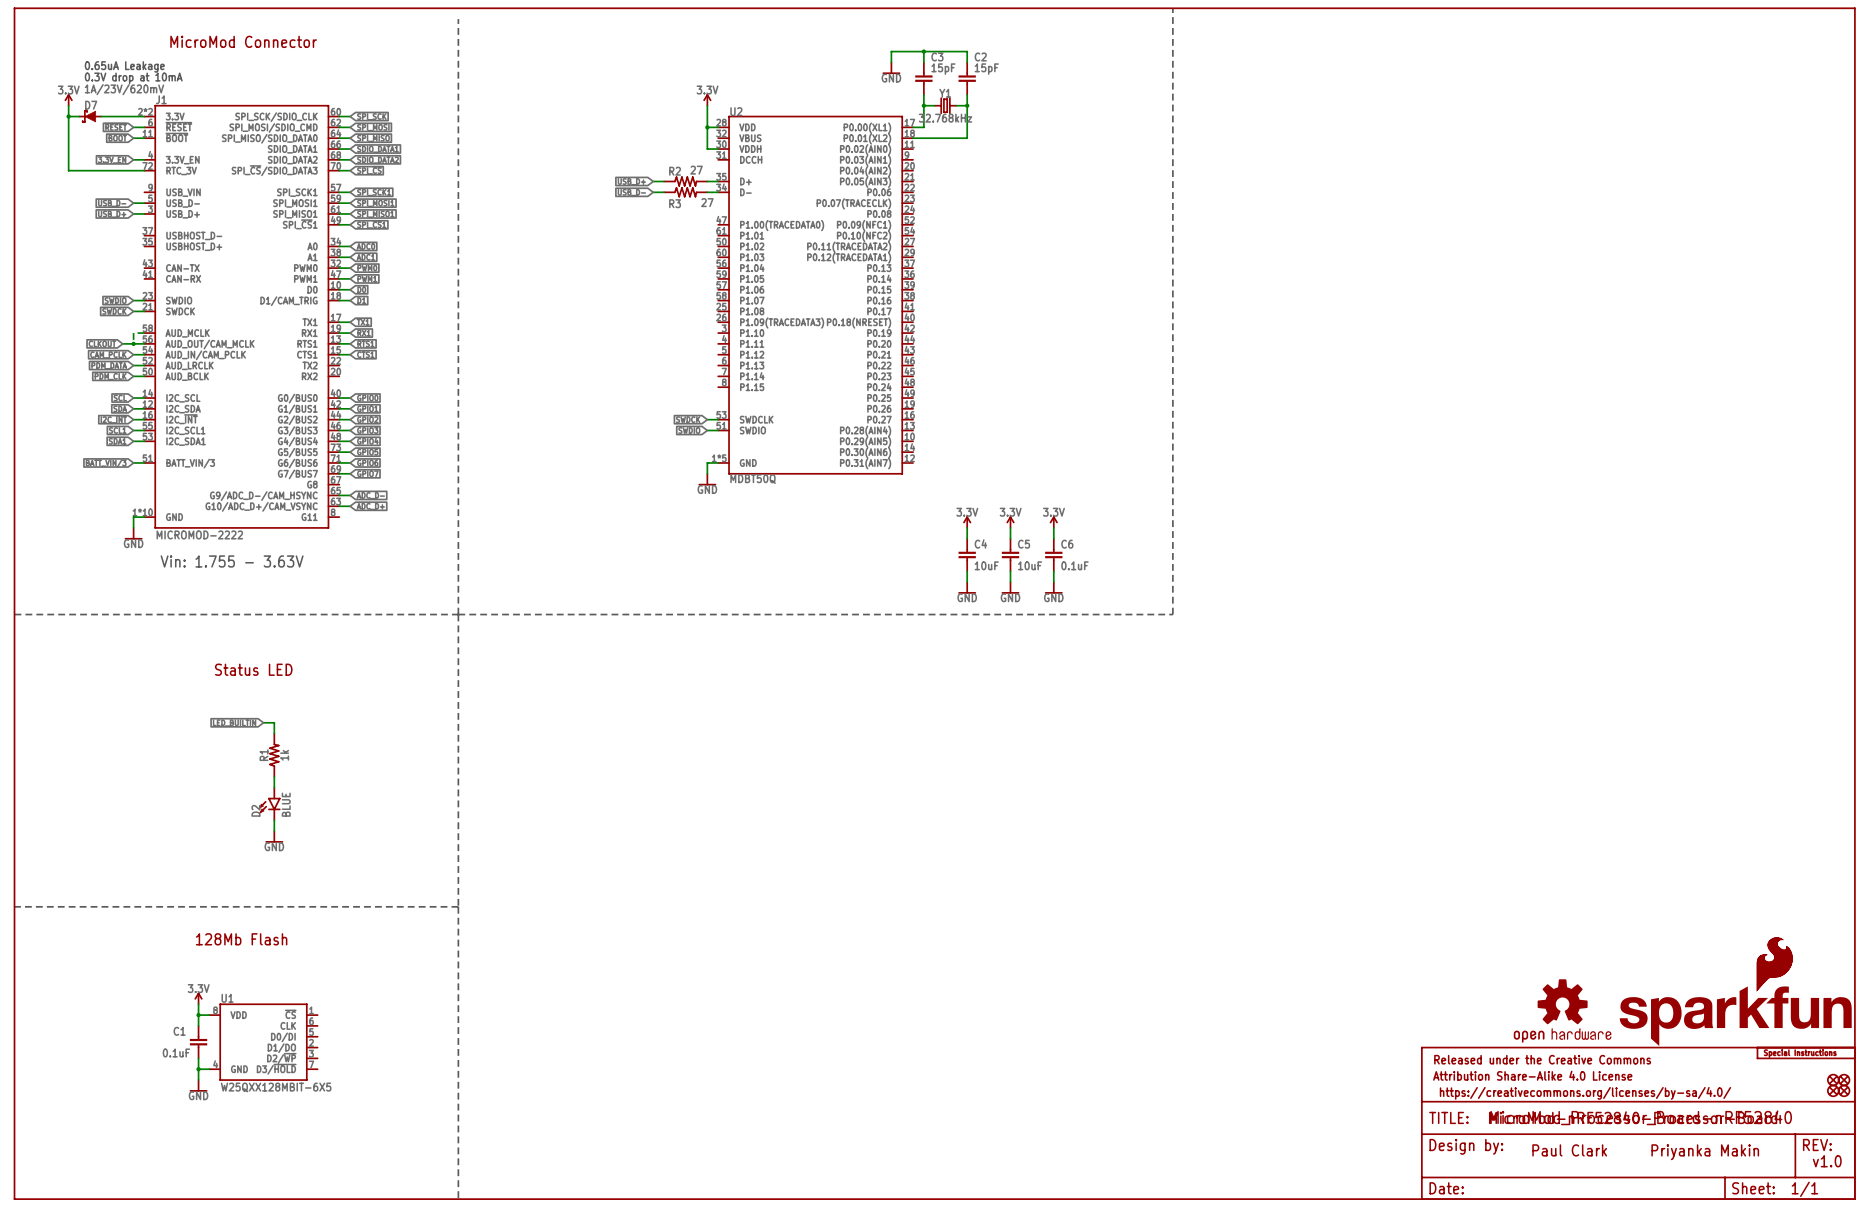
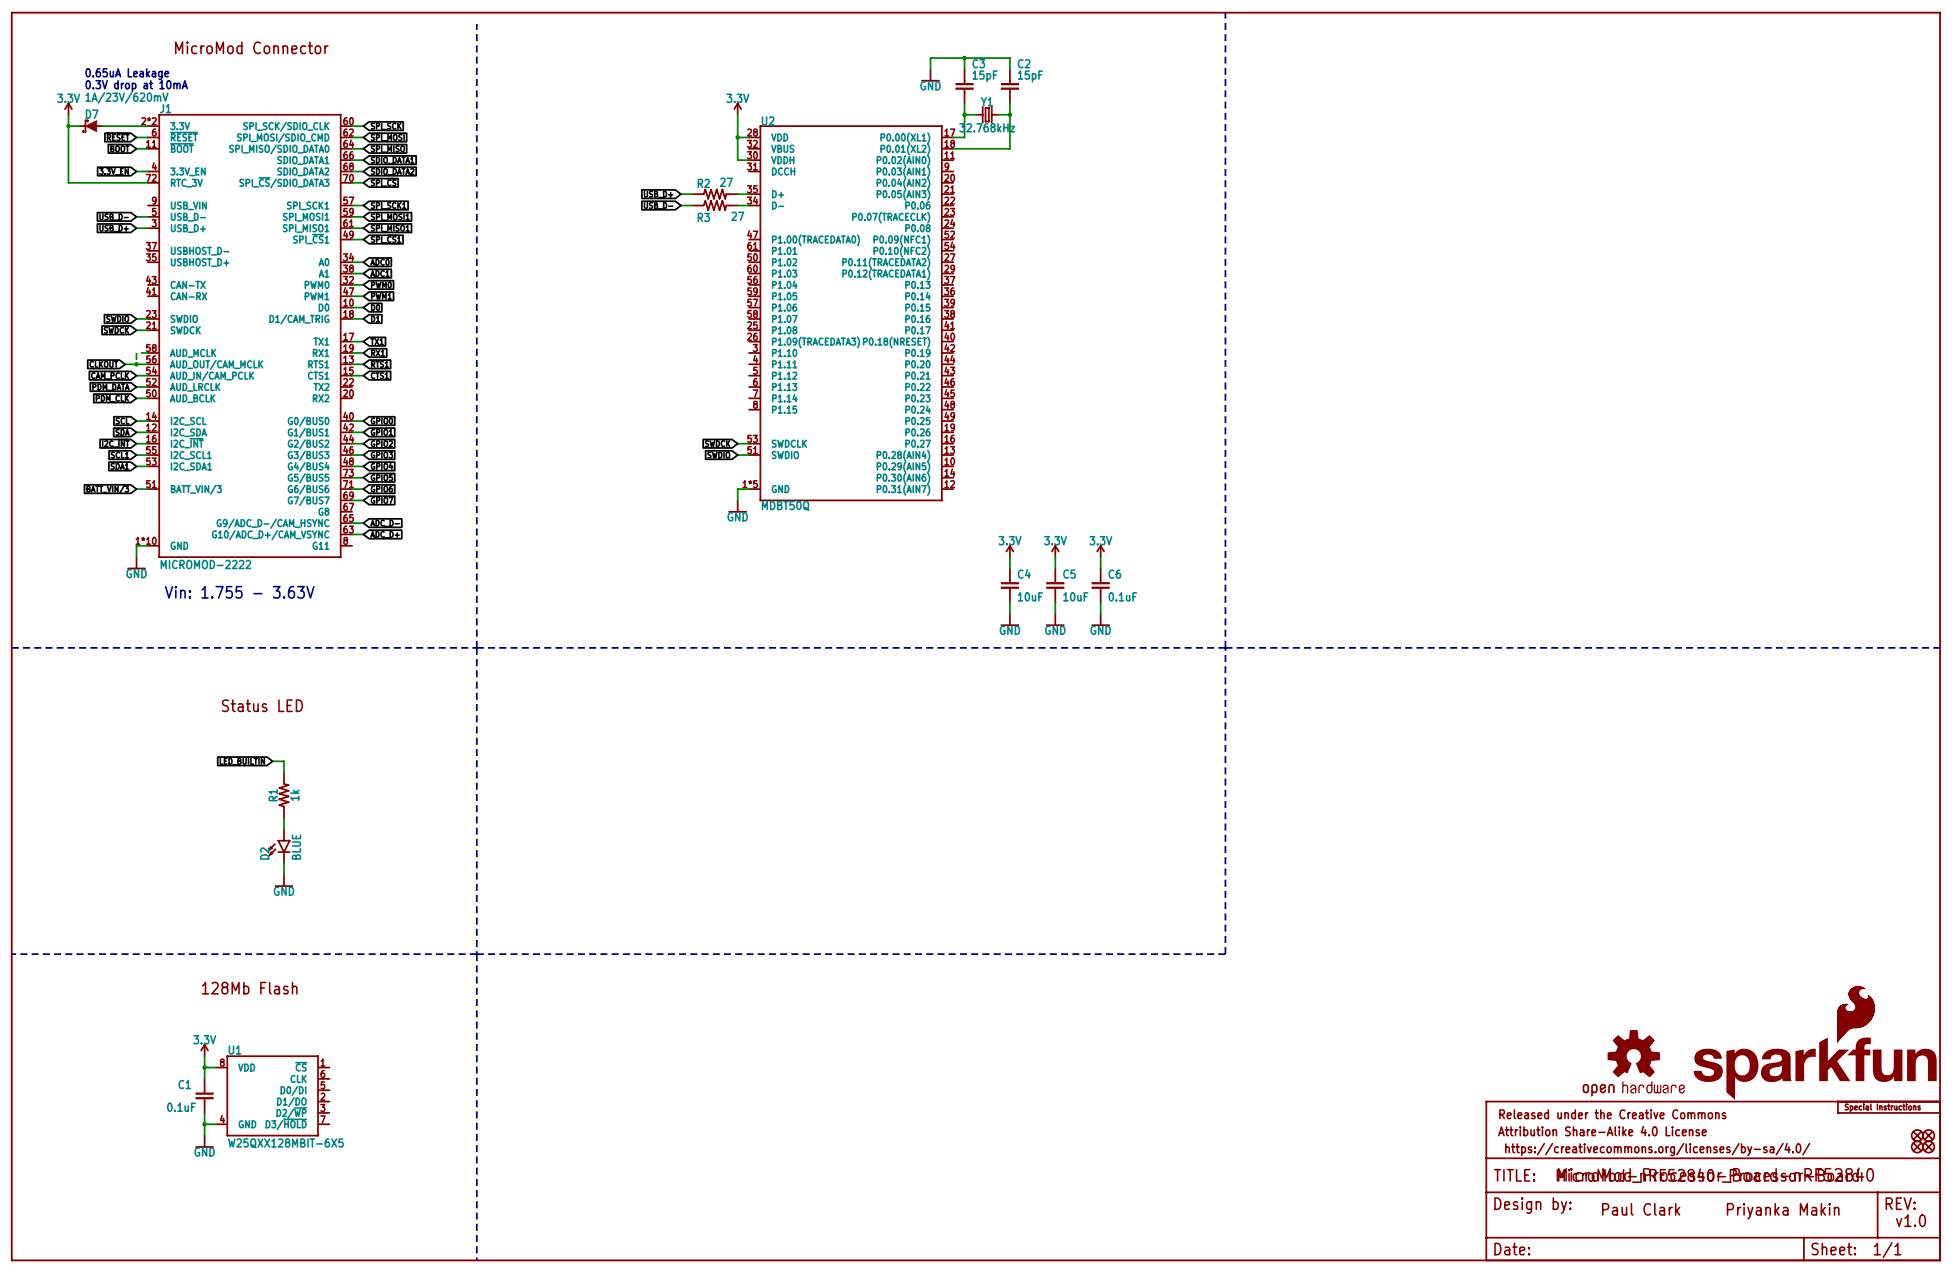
line: none -> (1940, 647) (1225, 647) (1225, 954) (476, 954)

